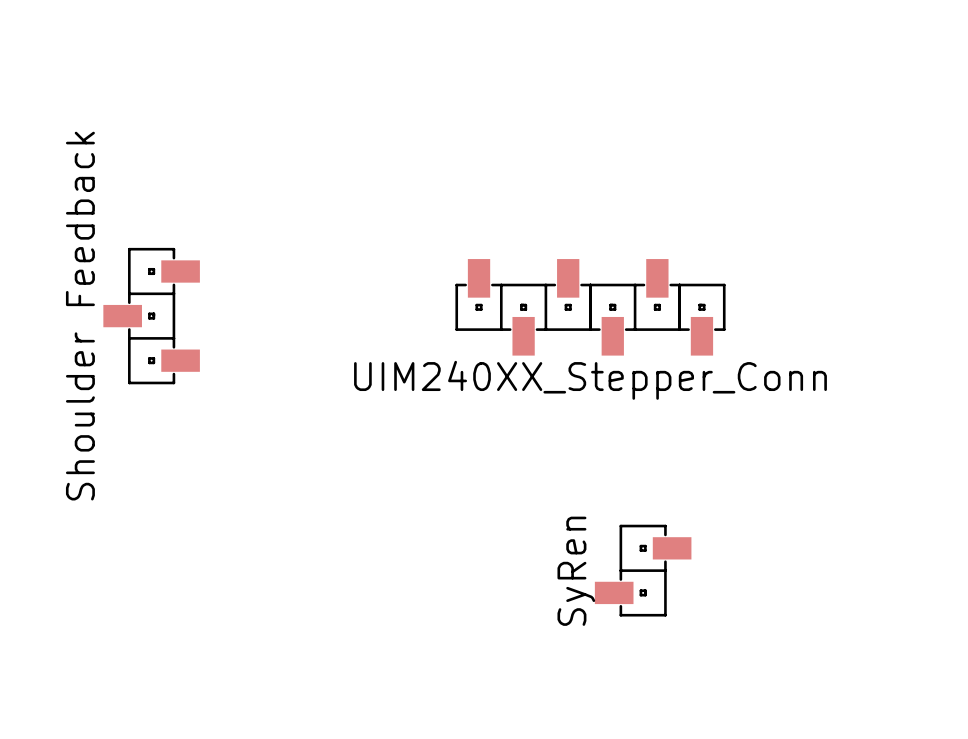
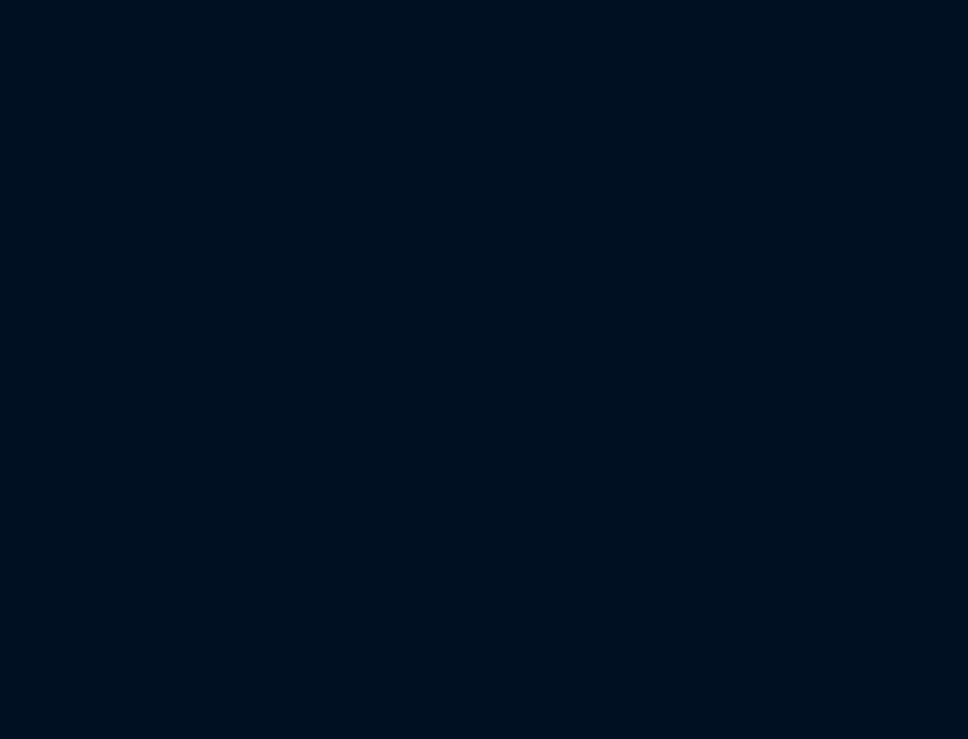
part: UIM240XX_Stepper_Conn (590, 307) -> none
part: Shoulder Feedback (151, 316) -> none
part: SyRen (643, 570) -> none

